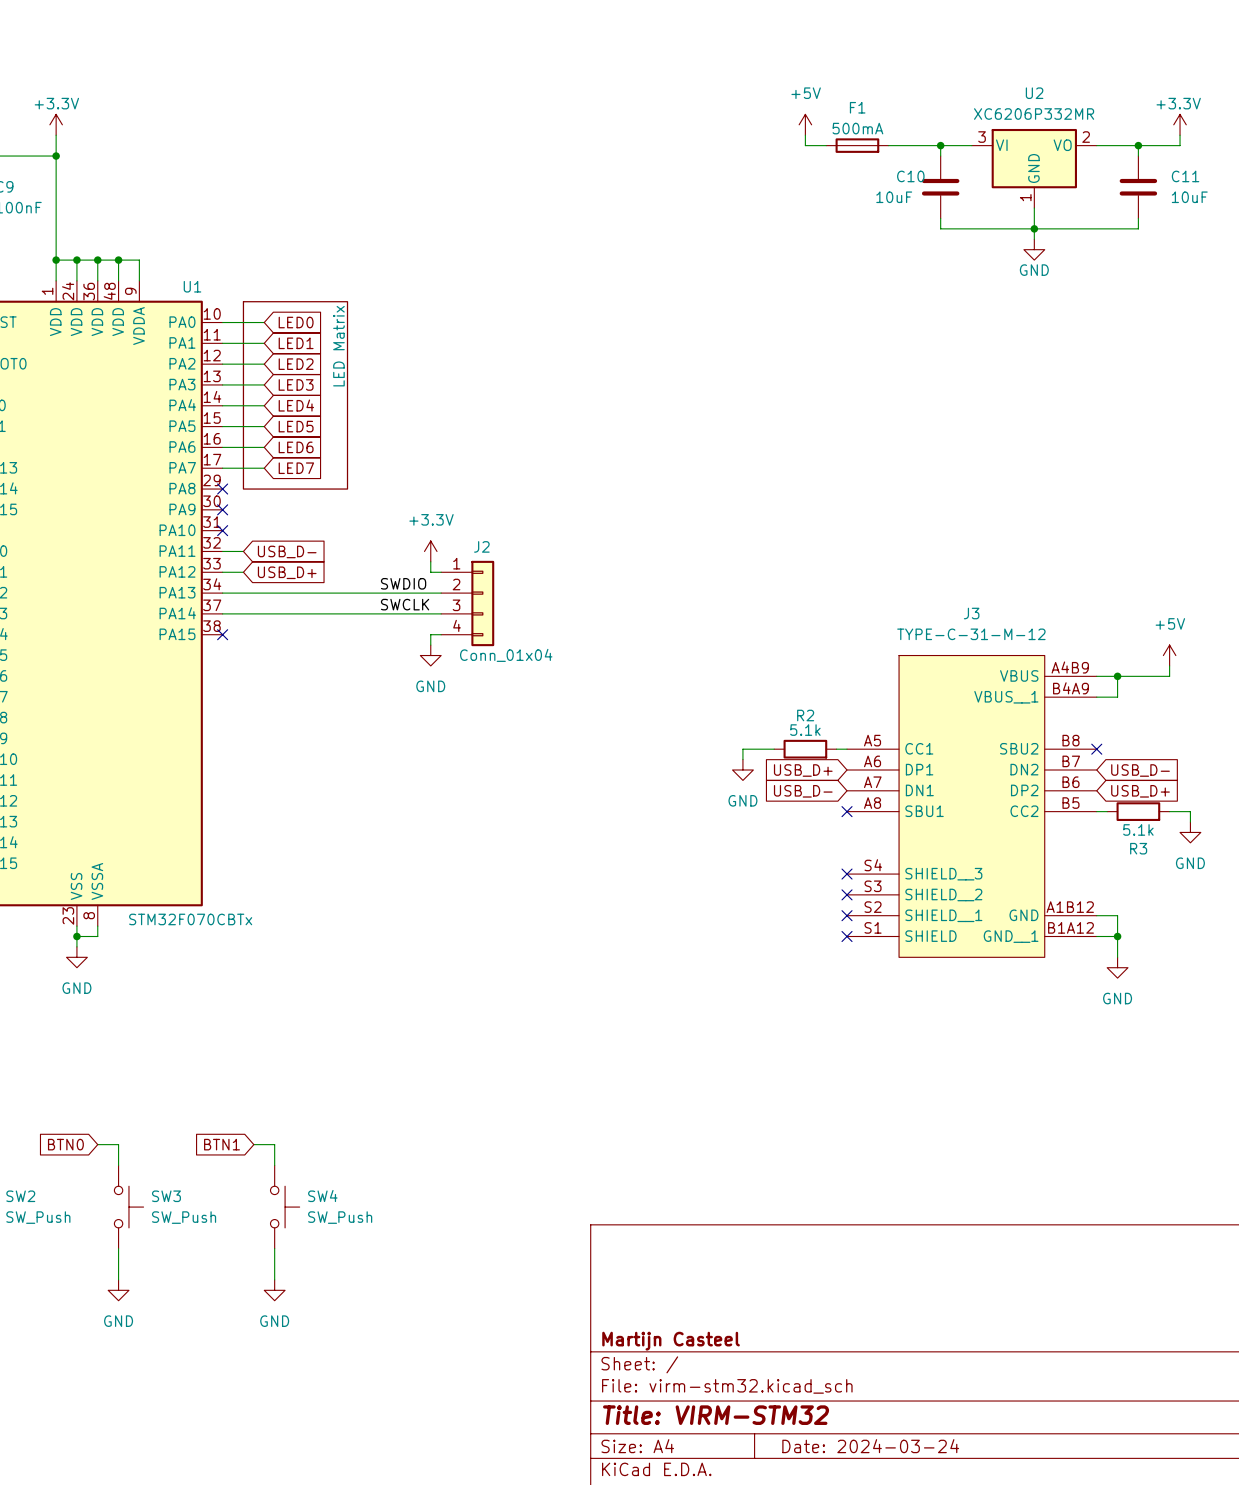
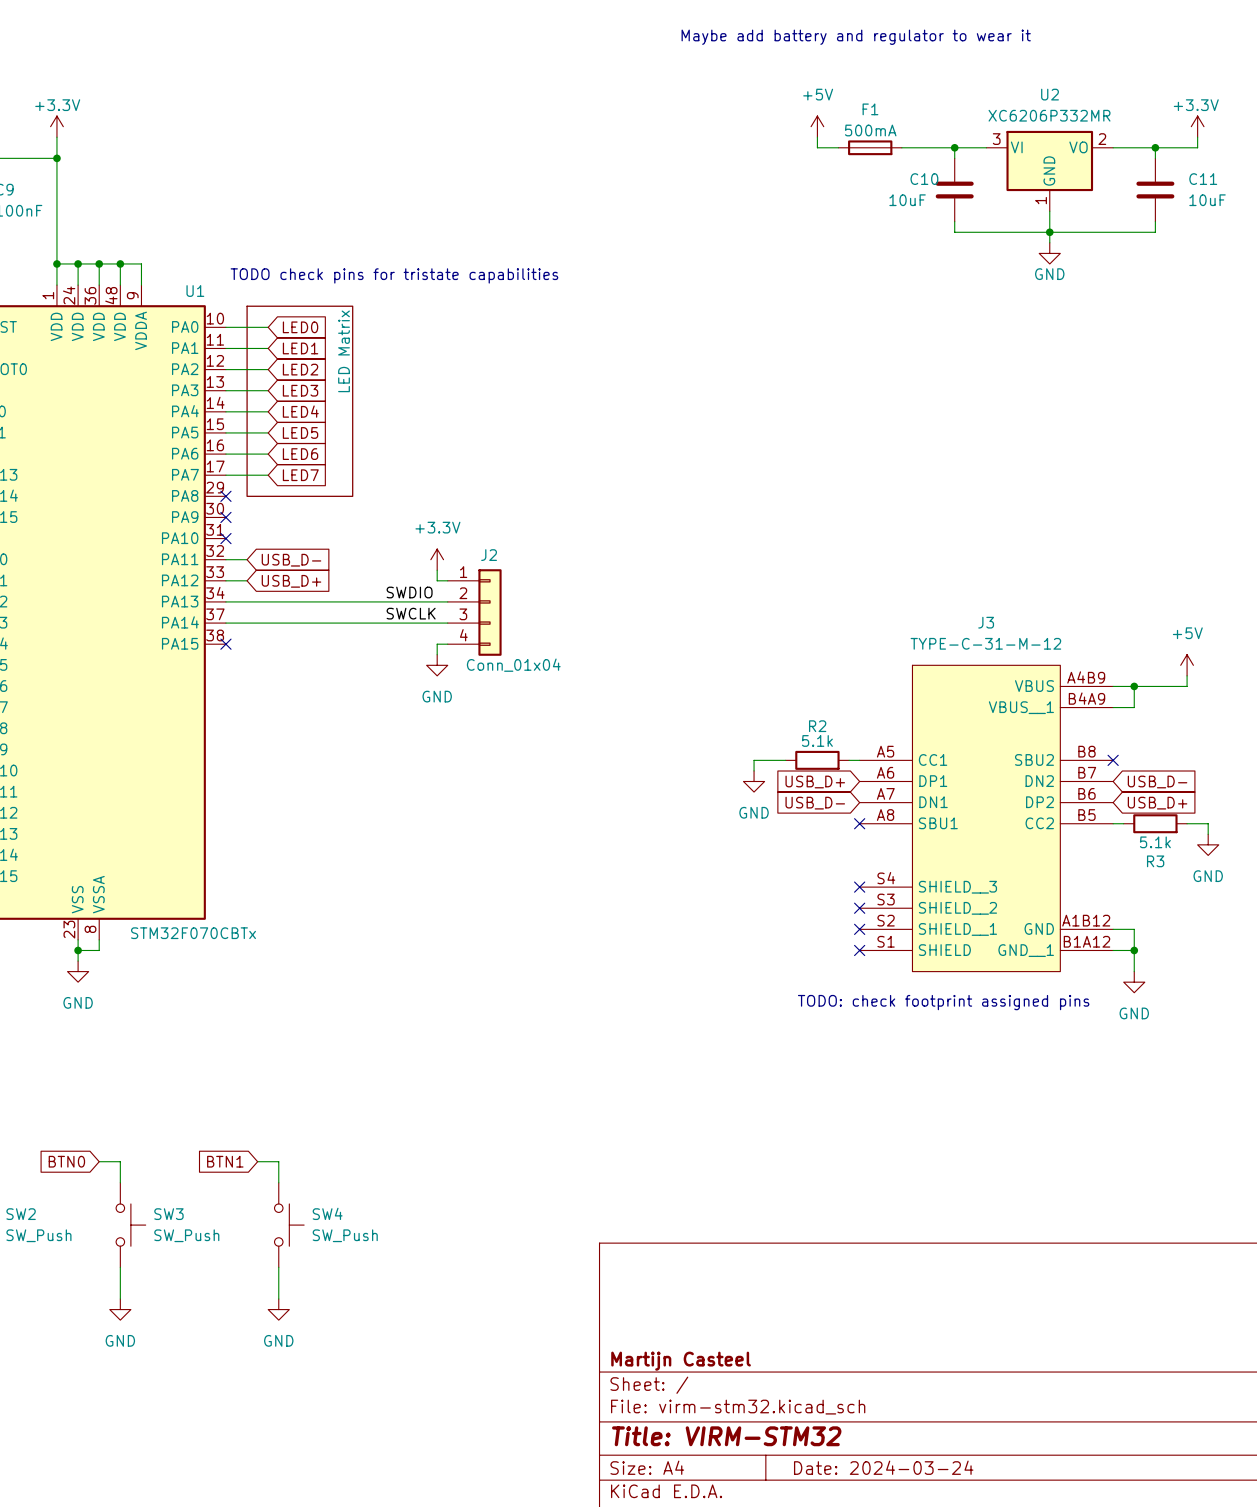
text: none -> Maybe add battery and regulator to wear it (856, 37)
text: none -> TODO check pins for tristate capabilities (394, 275)
text: none -> TODO: check footprint assigned pins (943, 1002)

